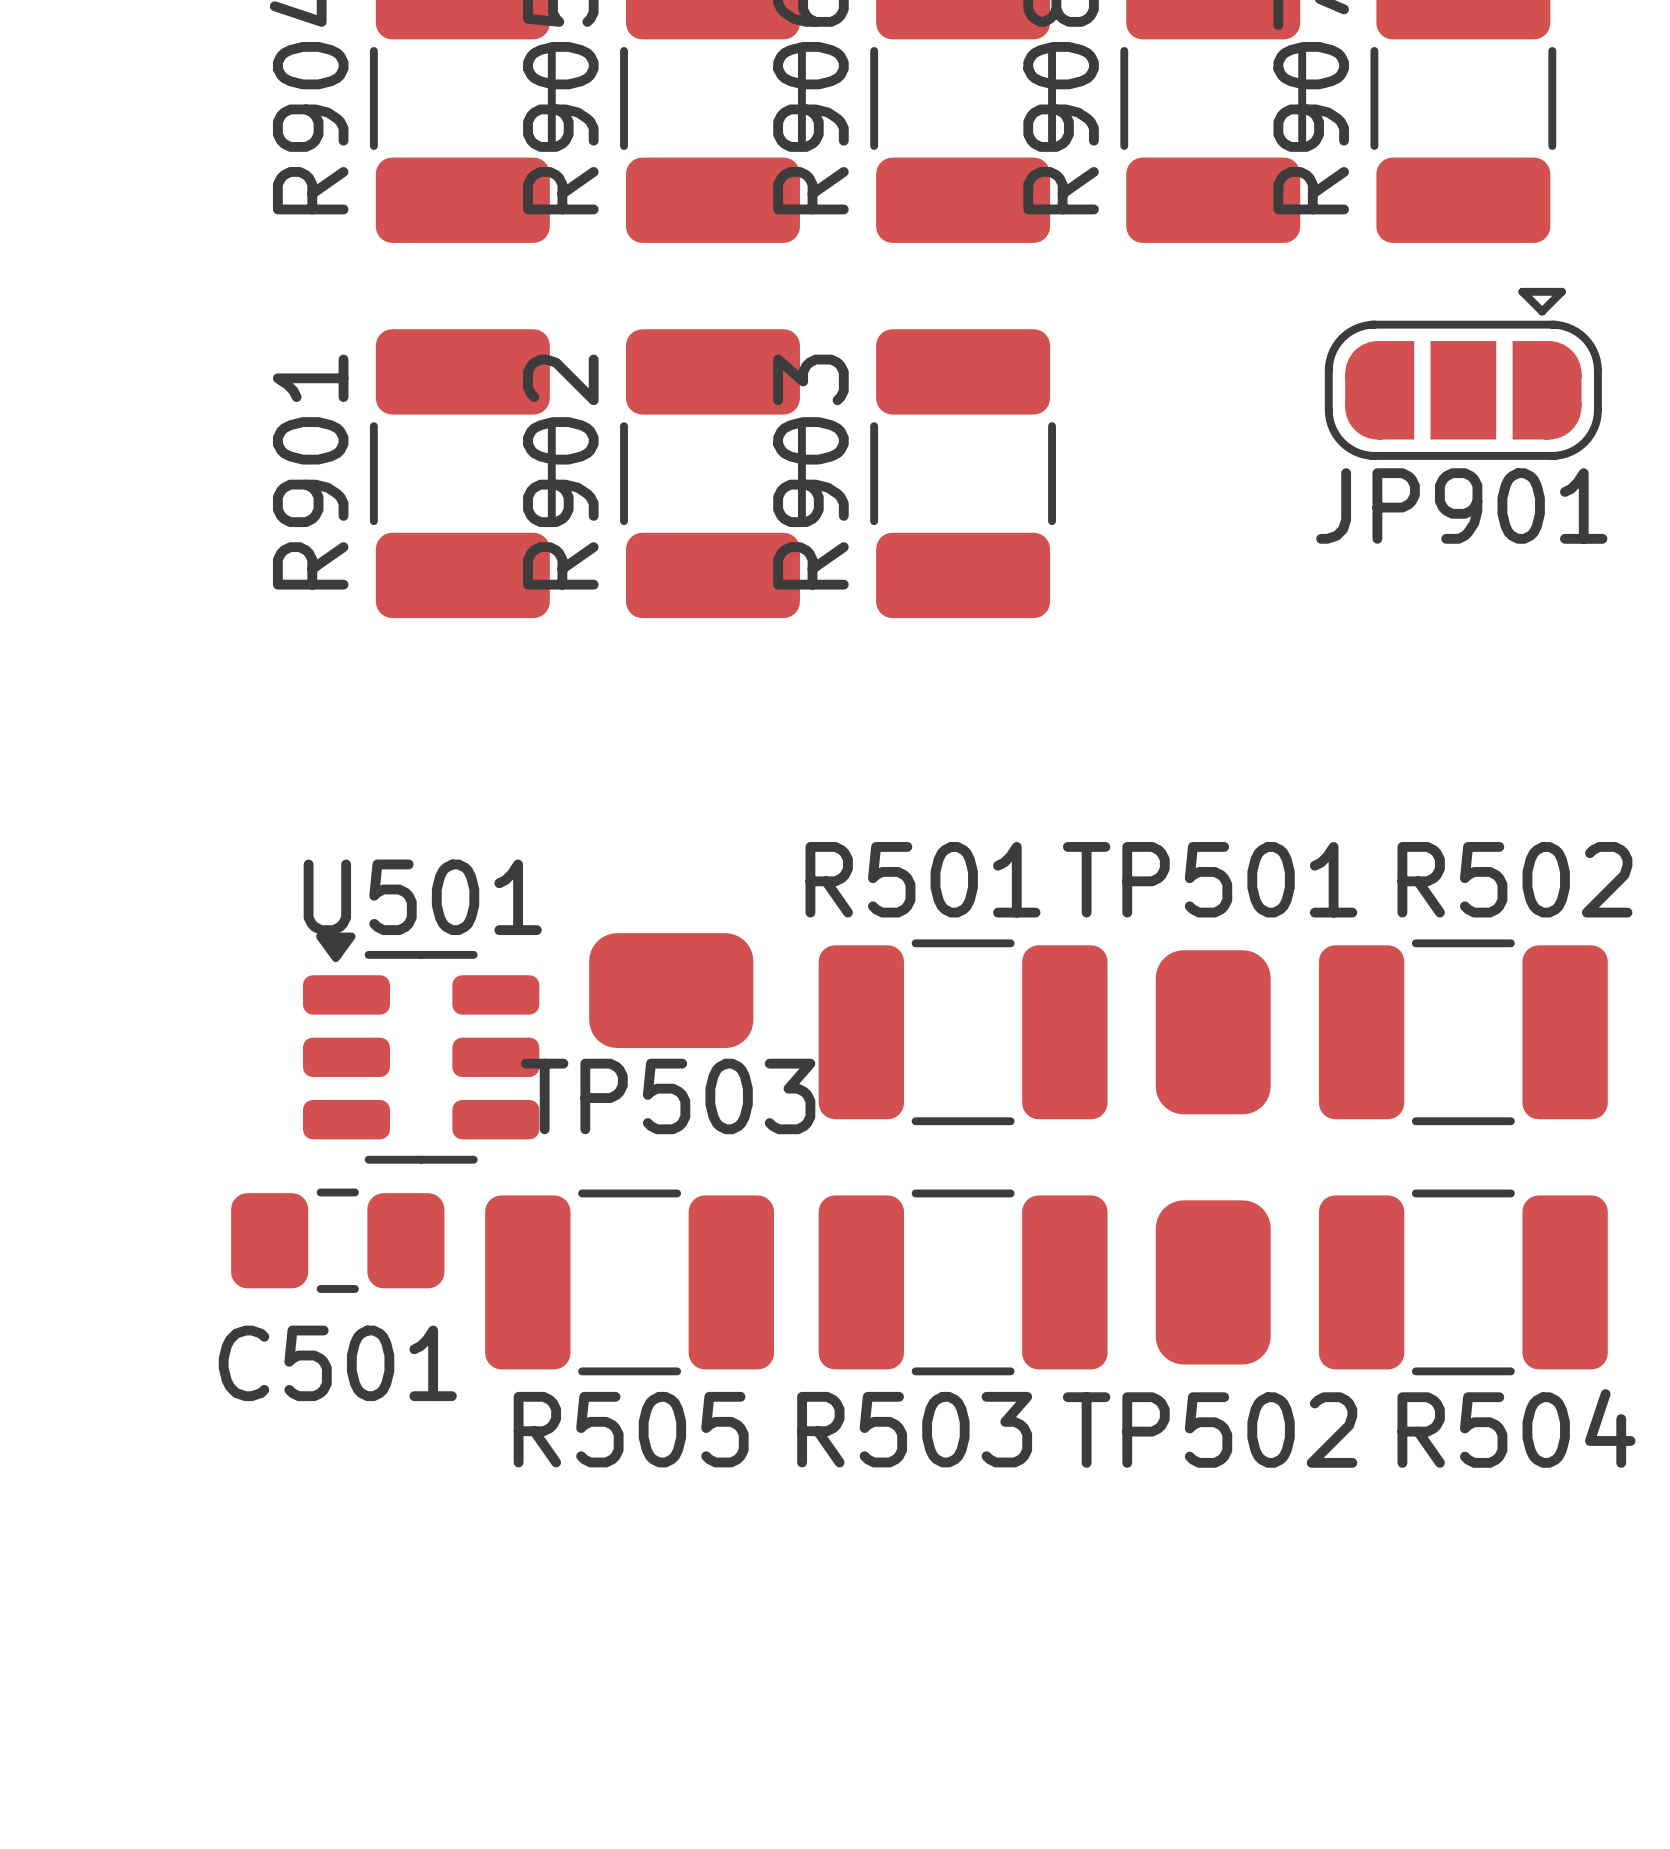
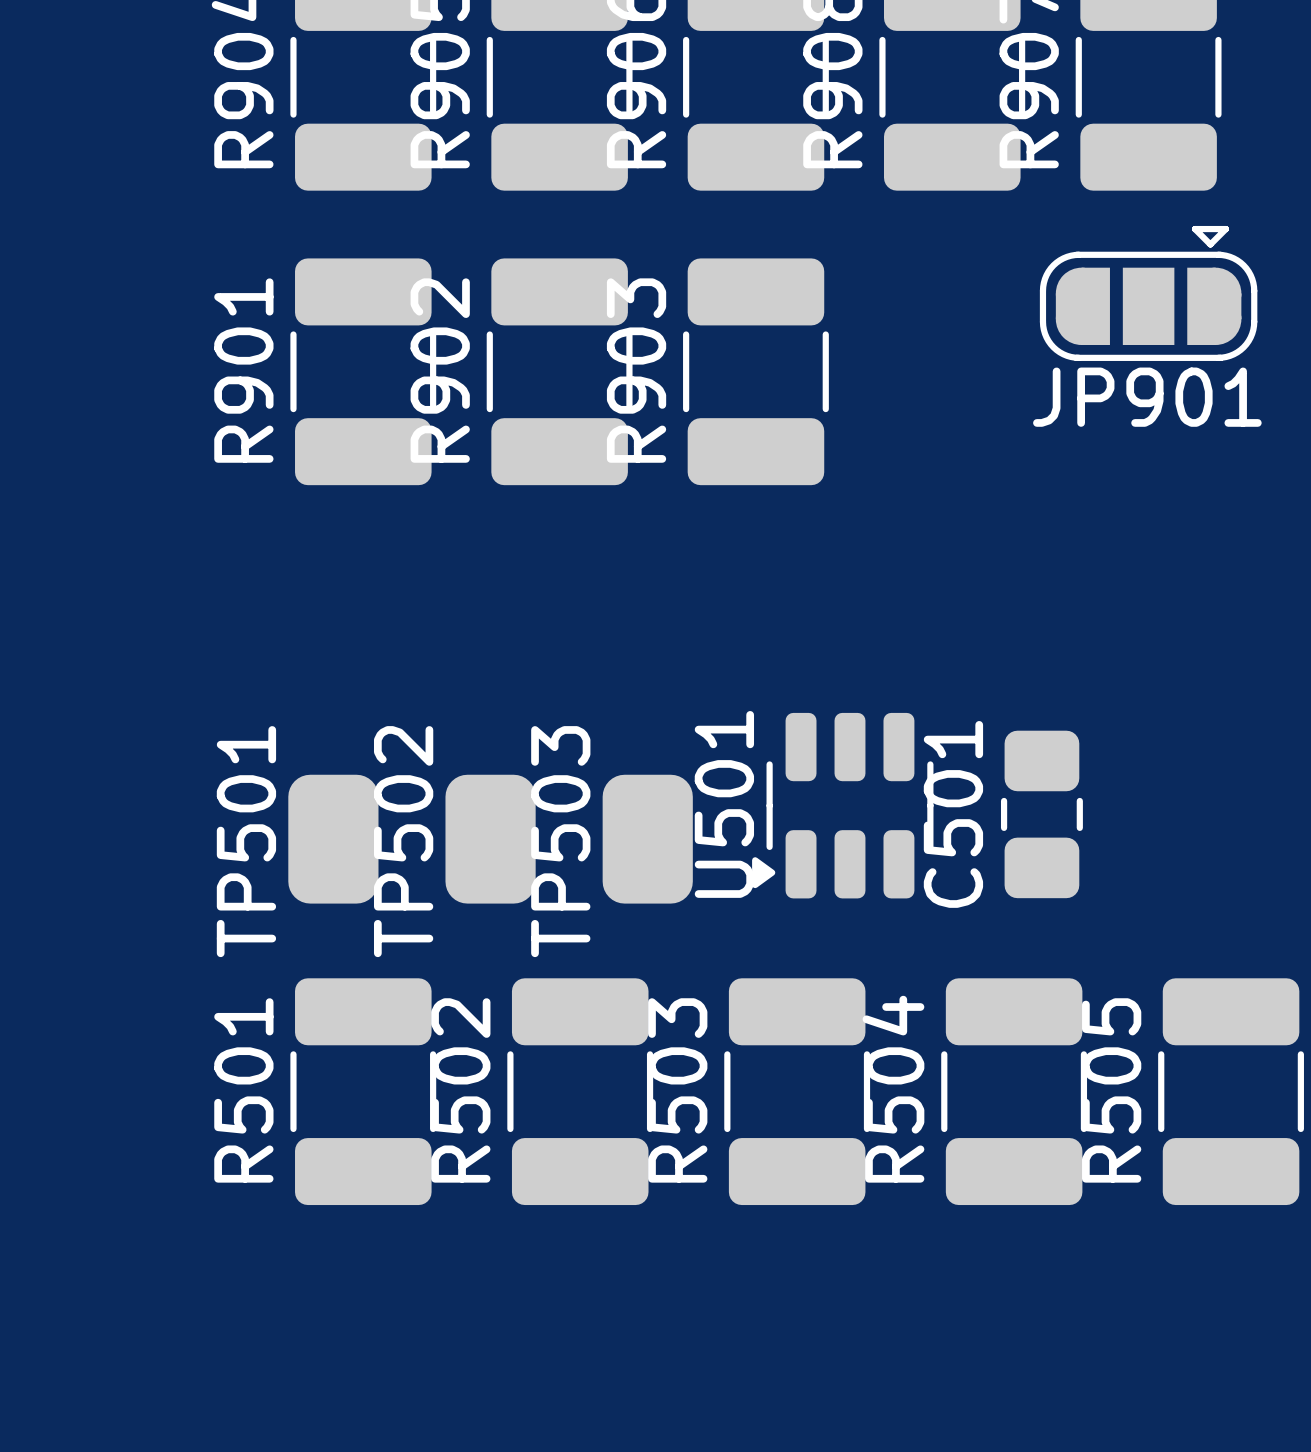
R501 name position: R501 (922, 879) -> R501 (243, 1090)
TP501 name rotation: 0° (1210, 879) -> 90° counterclockwise (246, 841)
R502 name position: R502 (1514, 879) -> R502 (460, 1090)
TP503 rotation: 0° (671, 990) -> 90° clockwise (647, 839)
TP503 position: (671, 990) -> (647, 839)
R501 rotation: 0° (963, 1032) -> 90° clockwise (363, 1091)
R501 position: (963, 1032) -> (363, 1091)
TP501 position: (1213, 1032) -> (333, 839)
R502 rotation: 0° (1463, 1032) -> 90° clockwise (580, 1091)
R502 position: (1463, 1032) -> (580, 1091)
U501 rotation: 0° (421, 1048) -> 90° counterclockwise (842, 805)
U501 position: (421, 1048) -> (842, 805)
C501 rotation: 0° (337, 1240) -> 90° clockwise (1041, 814)
C501 position: (337, 1240) -> (1041, 814)
R505 rotation: 0° (629, 1282) -> 90° clockwise (1231, 1091)
R505 position: (629, 1282) -> (1231, 1091)
R503 rotation: 0° (963, 1282) -> 90° clockwise (797, 1091)
TP502 position: (1213, 1282) -> (490, 839)
R504 rotation: 0° (1463, 1282) -> 90° clockwise (1014, 1091)
R504 position: (1463, 1282) -> (1014, 1091)
TP502 name rotation: 0° (1210, 1430) -> 90° counterclockwise (403, 841)

